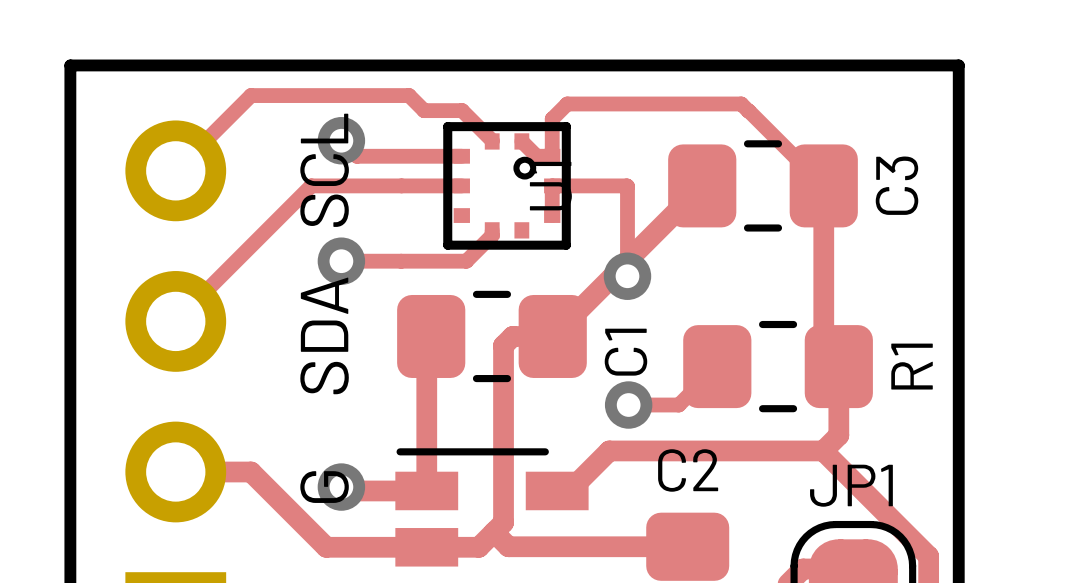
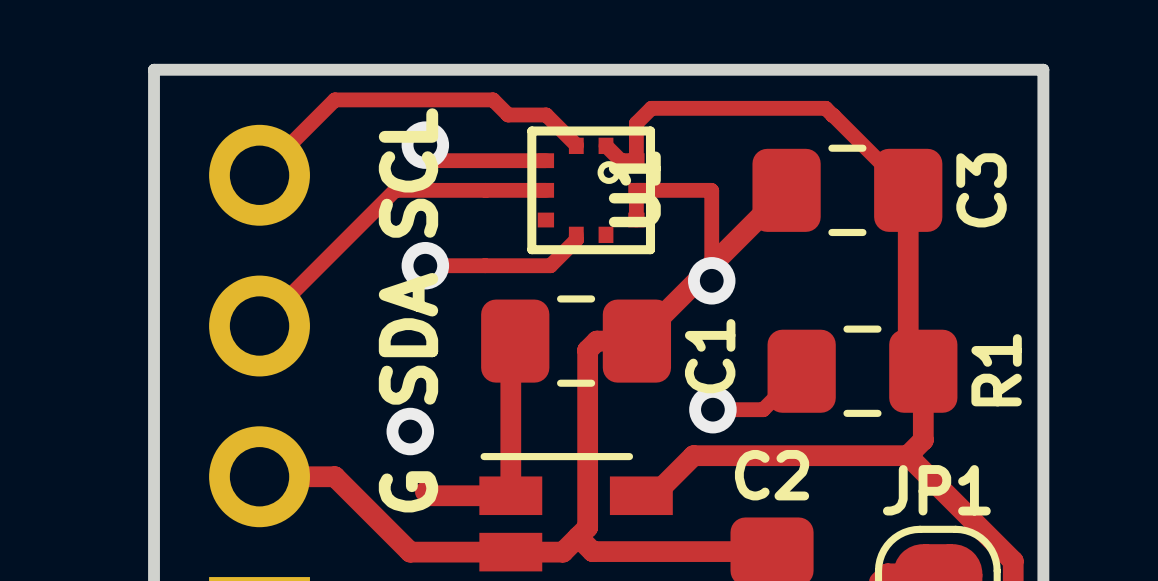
via position: (341, 487) -> (410, 431)

